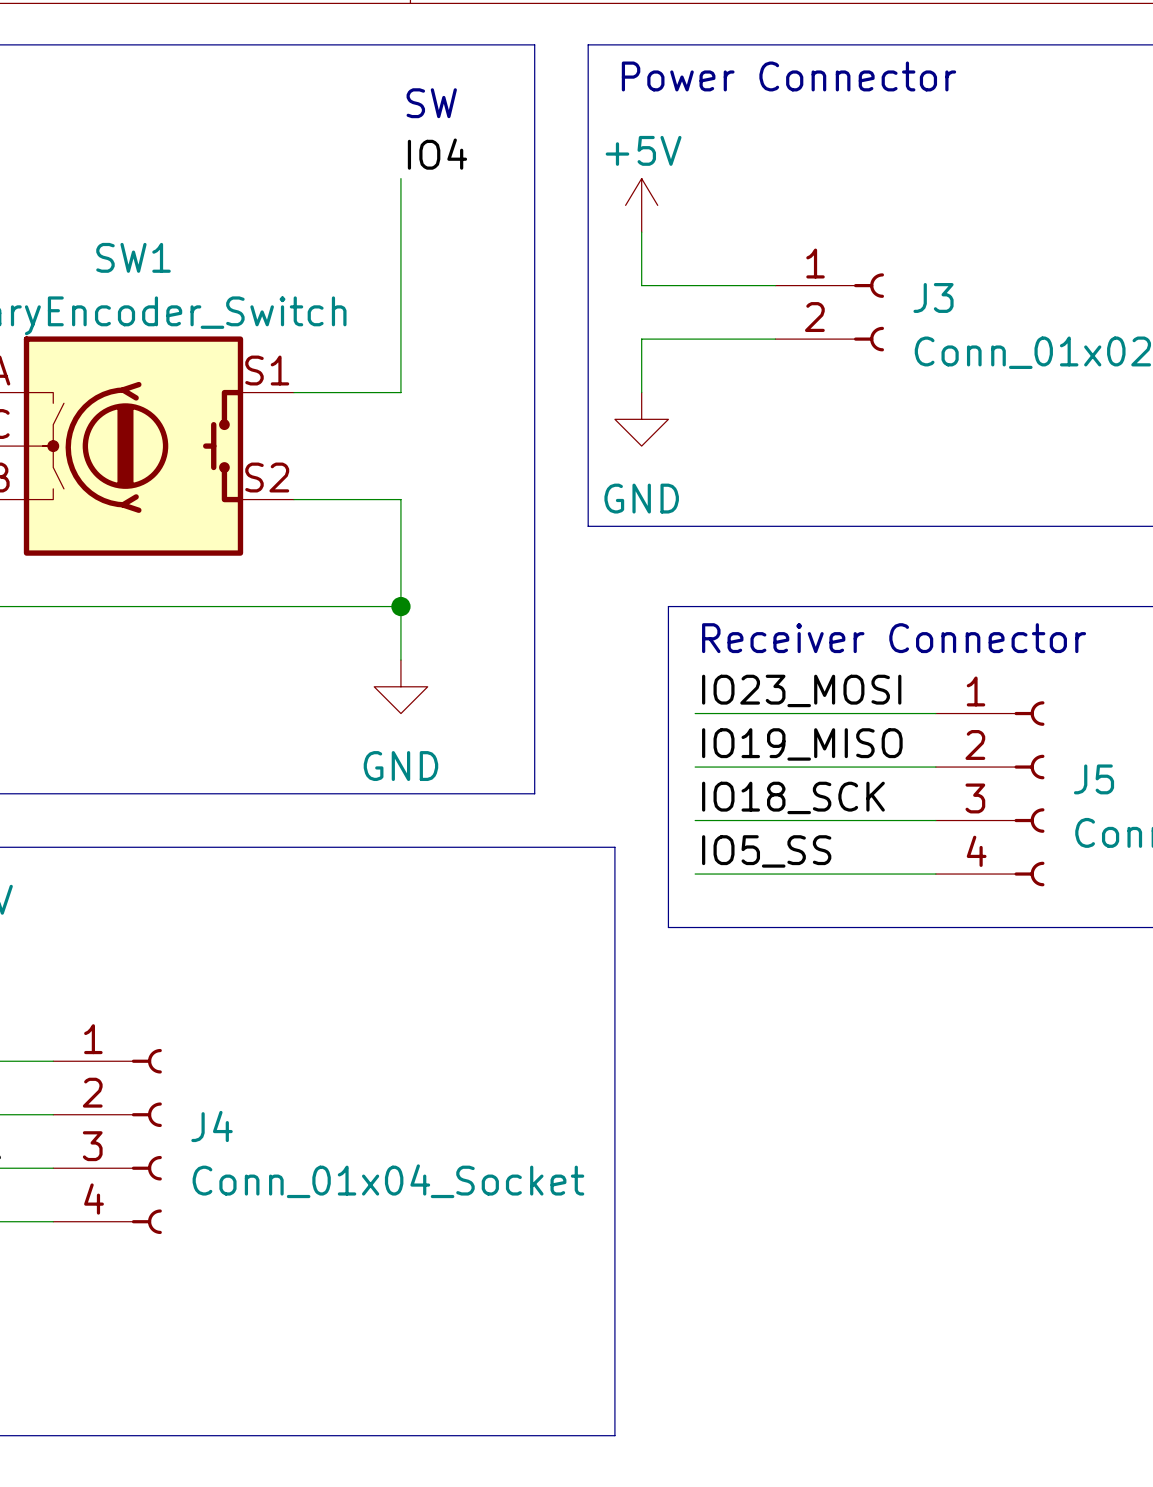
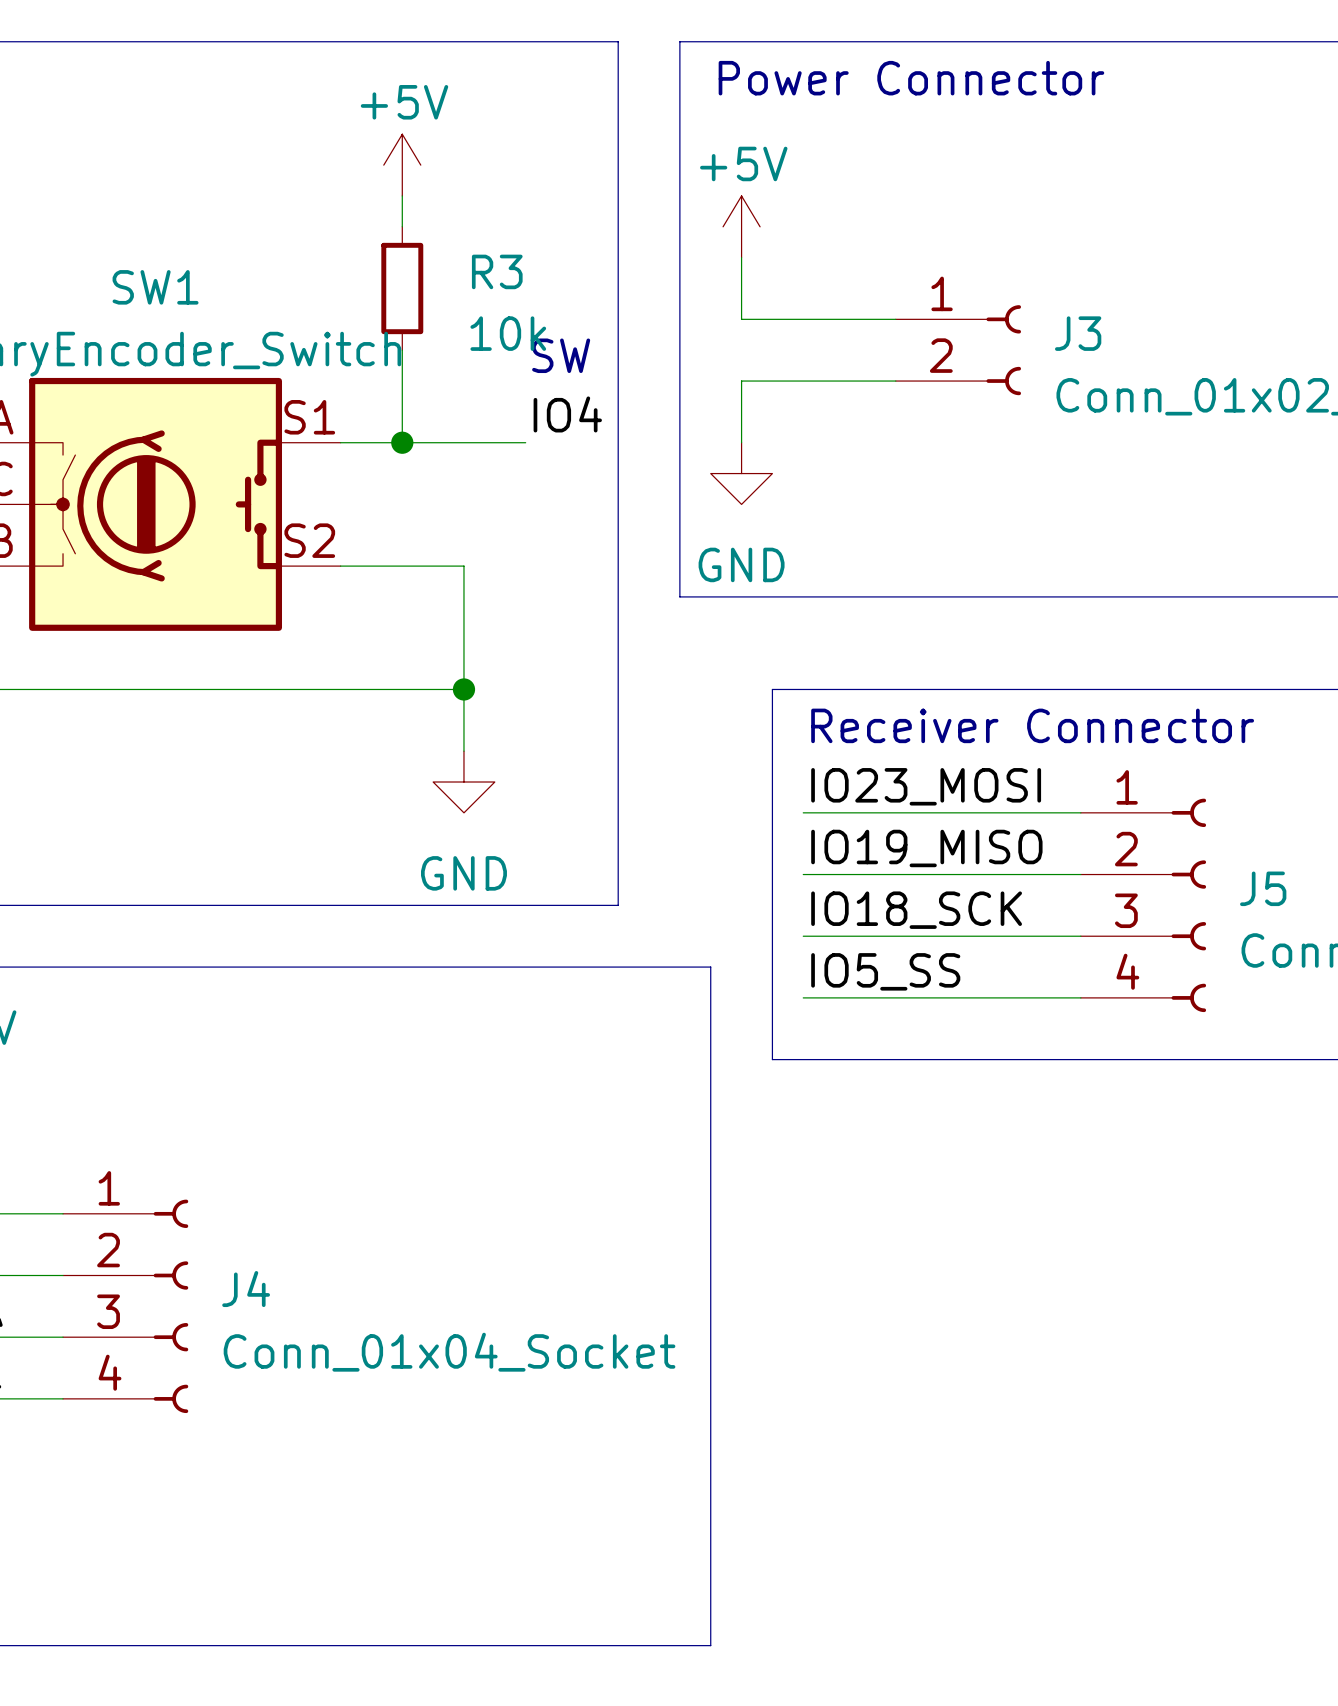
text position: SW (431, 103) -> SW (561, 355)
power symbol: none -> +5V (402, 165)
label position: IO4 (437, 154) -> IO4 (567, 414)
wire: none -> (402, 195) (402, 226)
wire: (400, 178) (400, 392) -> (525, 442) (463, 442)
R3: none -> 10k (402, 288)
wire: none -> (402, 350) (402, 442)
junction: none -> (402, 442)

